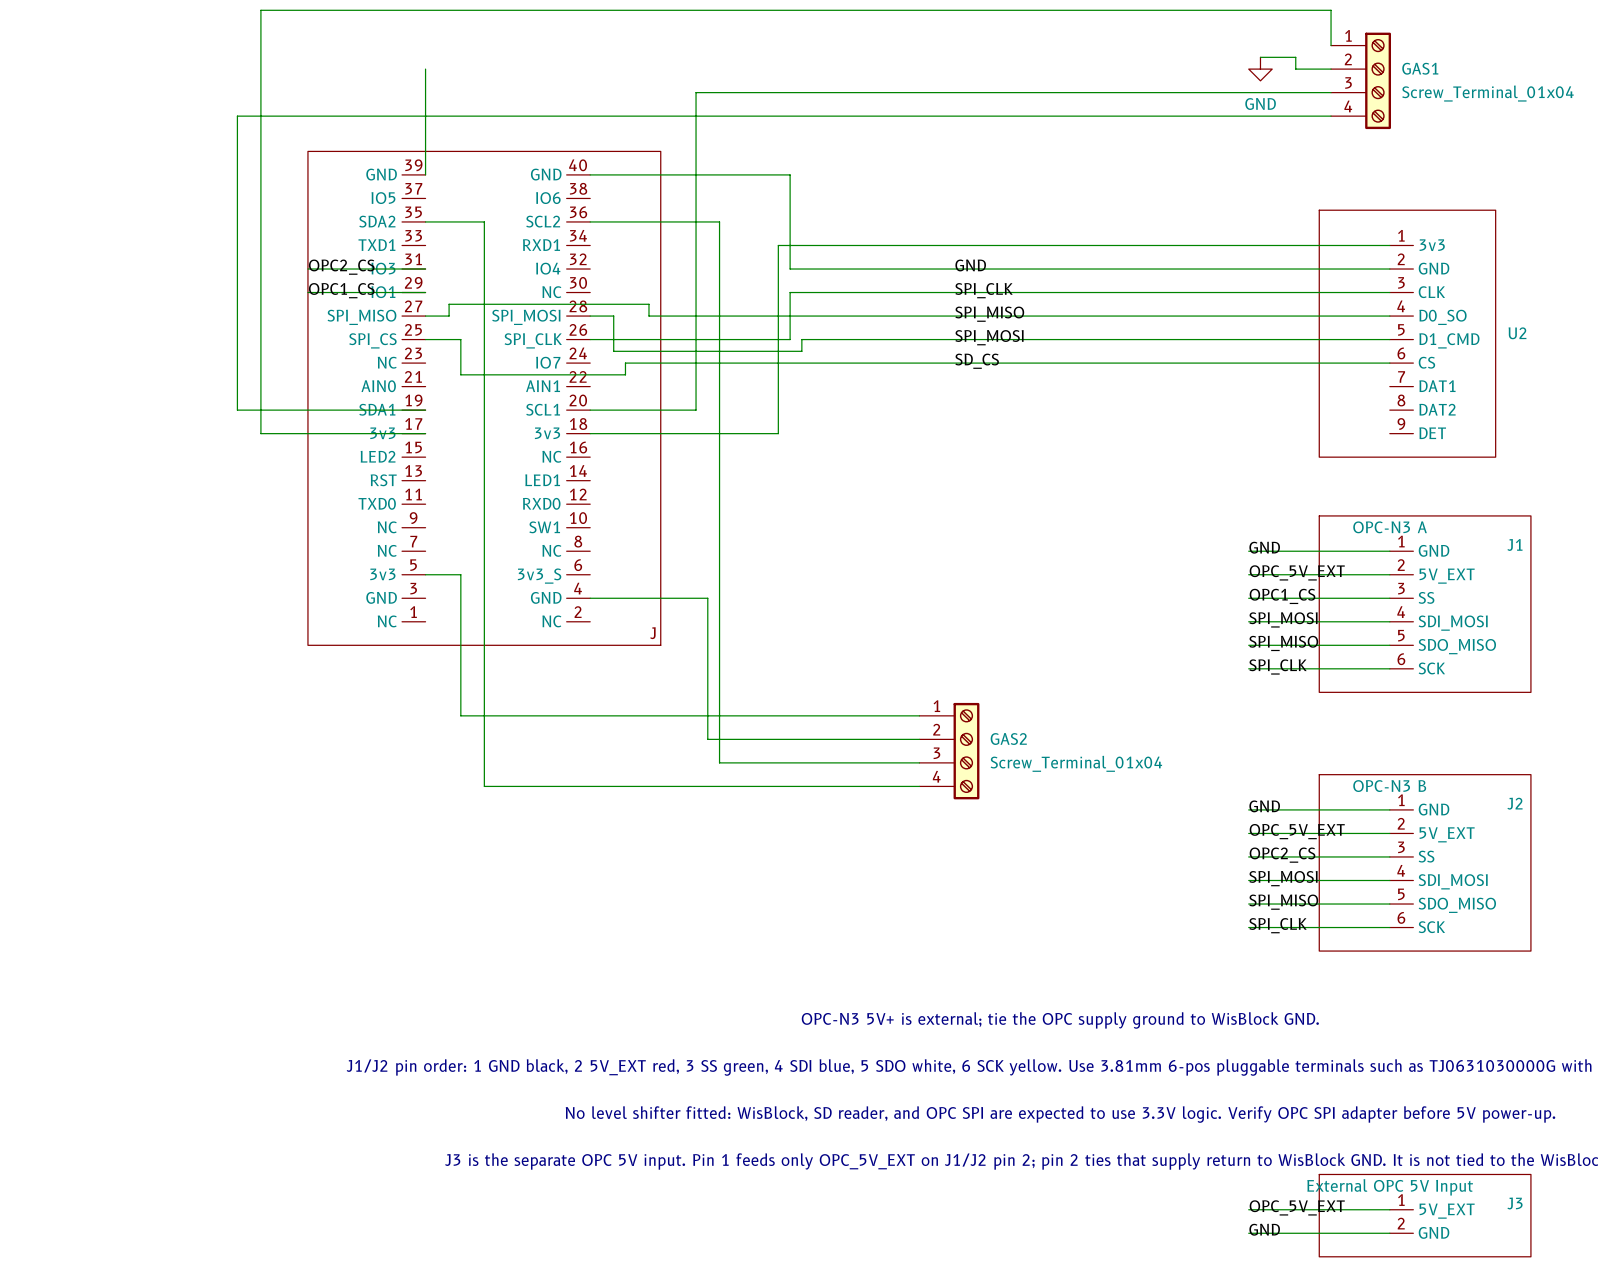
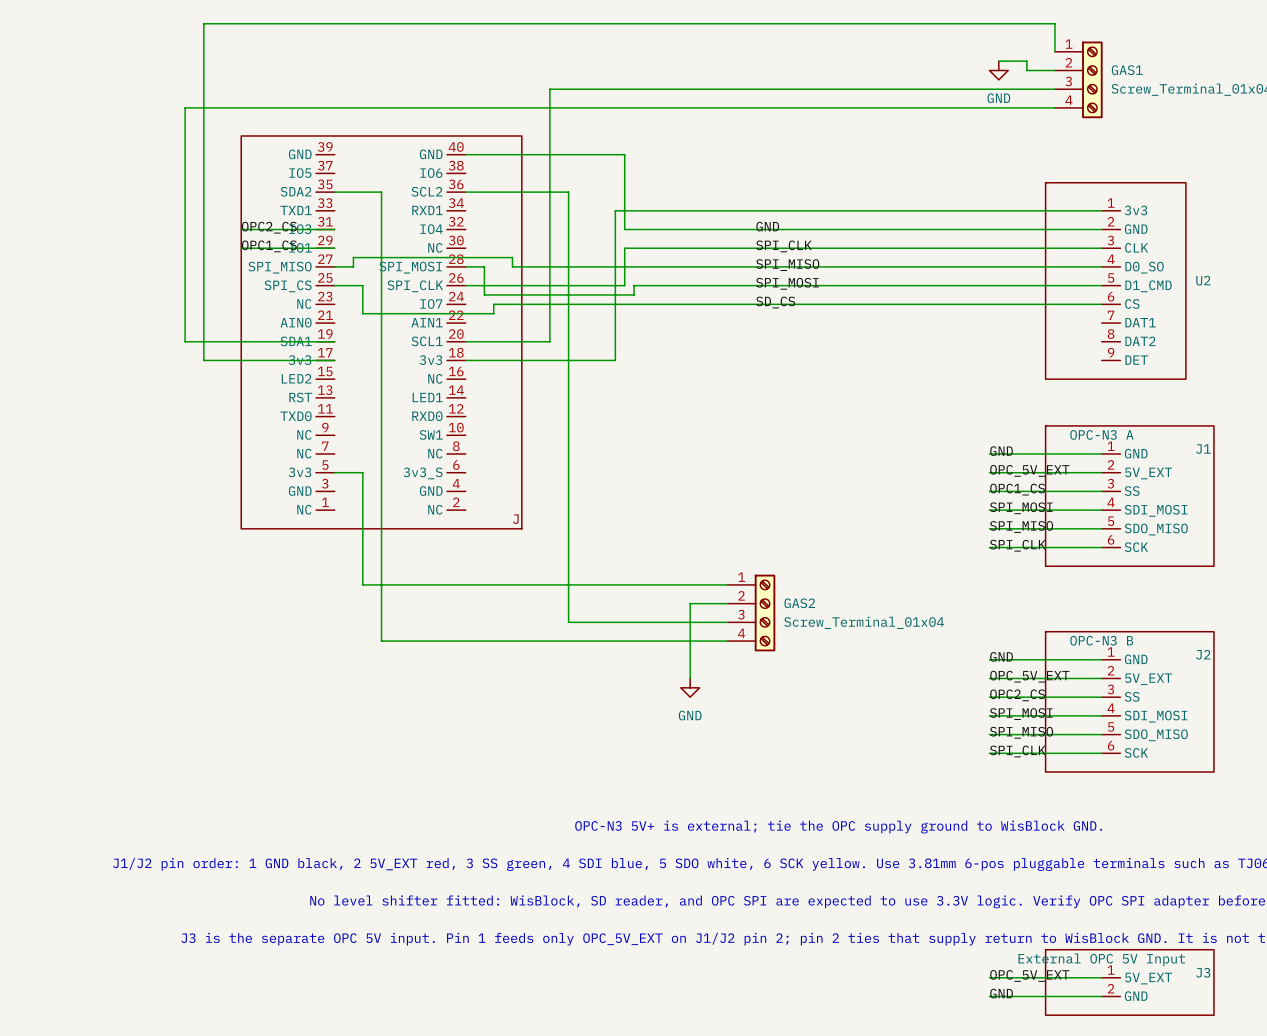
wire: (425, 69) (425, 174) -> none
wire: (590, 598) (707, 598) (707, 739) (872, 739) -> (690, 678) (690, 603)
power symbol: none -> GND (690, 687)

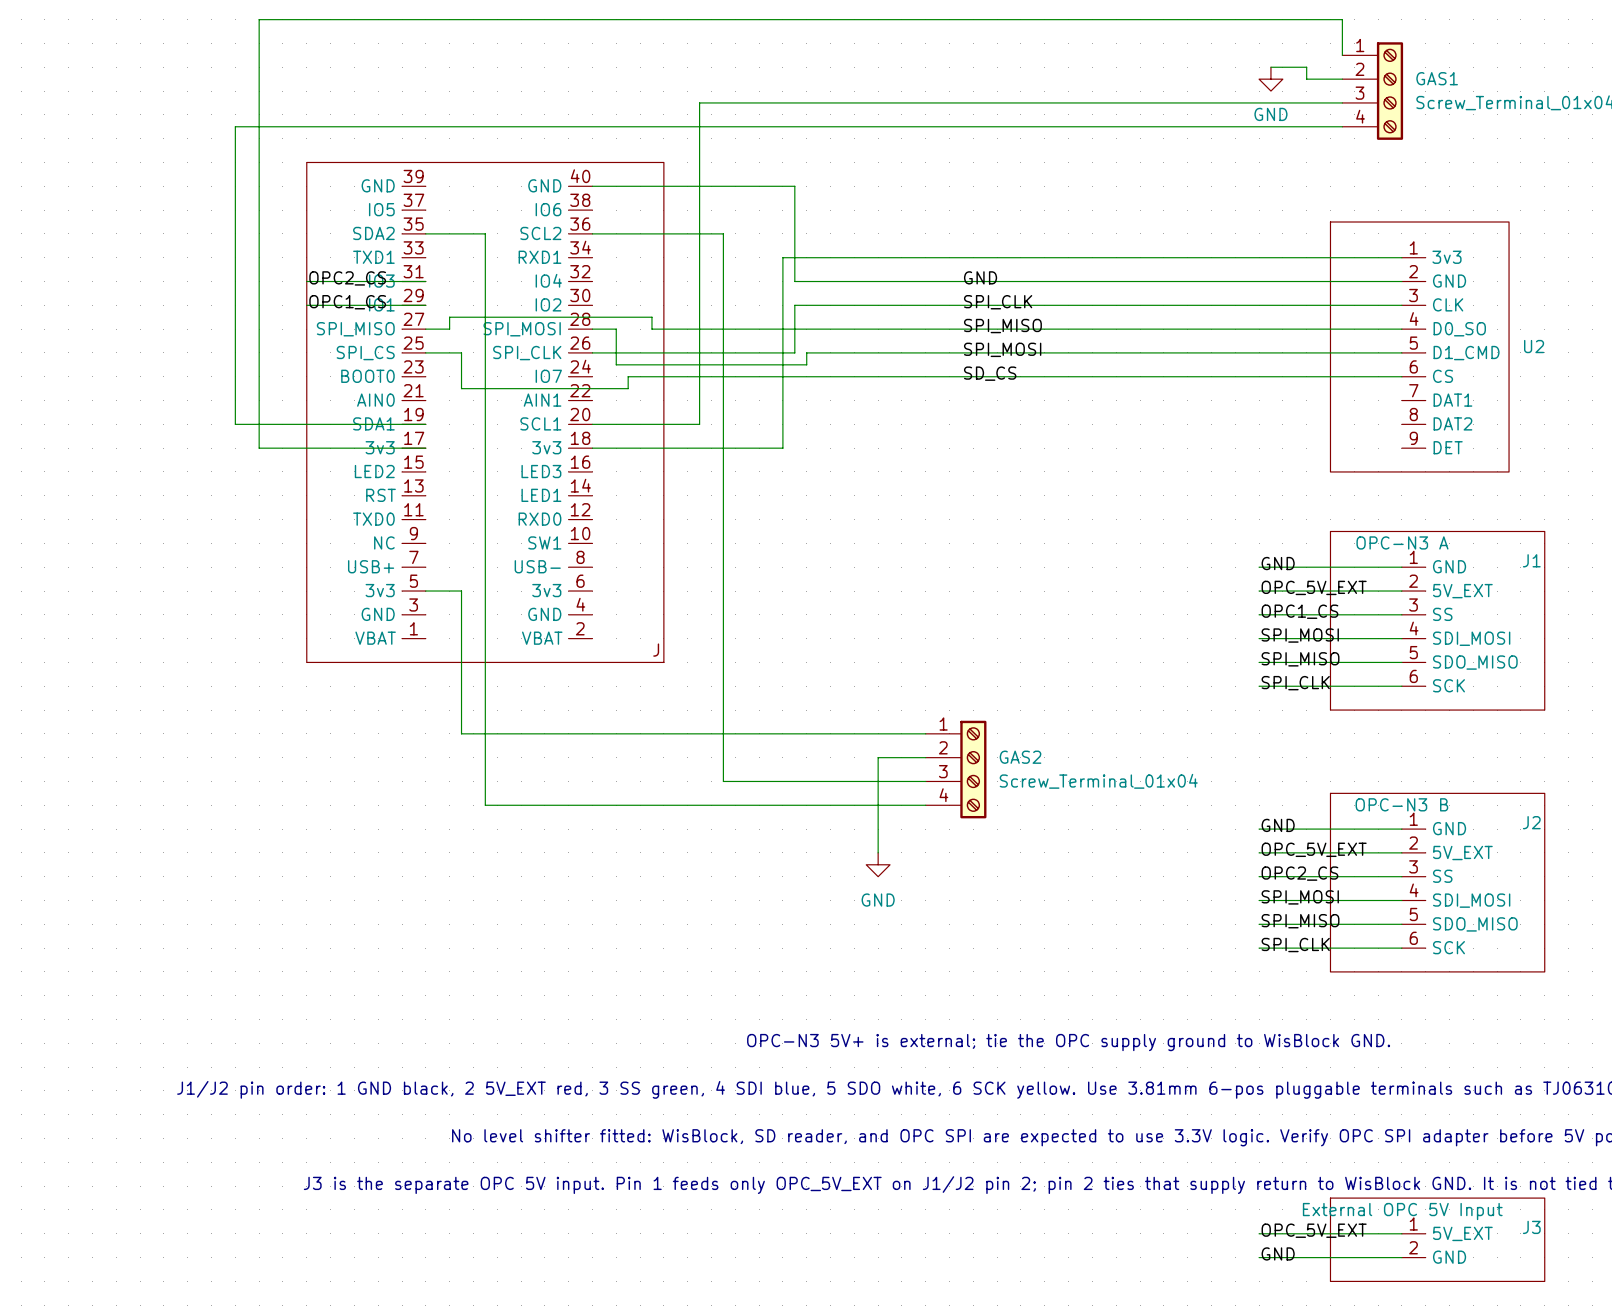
part pin name: NC (435, 247) -> IO2 (548, 304)
part pin name: NC (304, 303) -> BOOT0 (367, 376)
part pin name: NC (435, 378) -> LED3 (541, 471)
part pin name: NC (304, 453) -> USB+ (371, 566)
part pin name: NC (435, 453) -> USB- (537, 566)
part pin name: 3v3_S (423, 473) -> 3v3 (546, 590)
part pin name: NC (304, 509) -> VBAT (375, 638)
part pin name: NC (435, 509) -> VBAT (542, 638)

